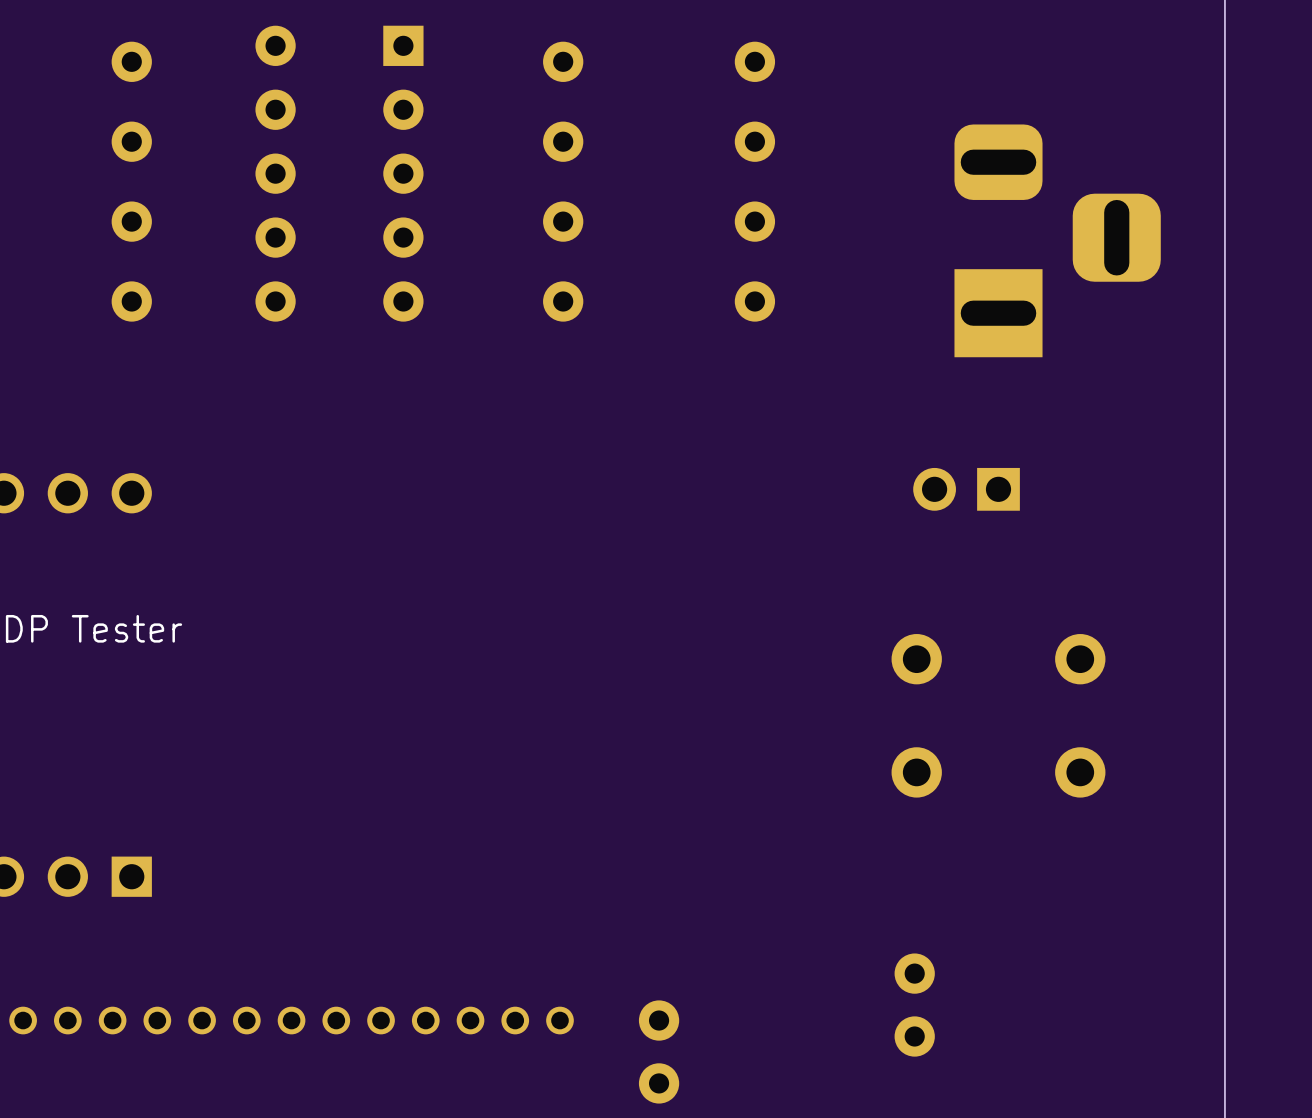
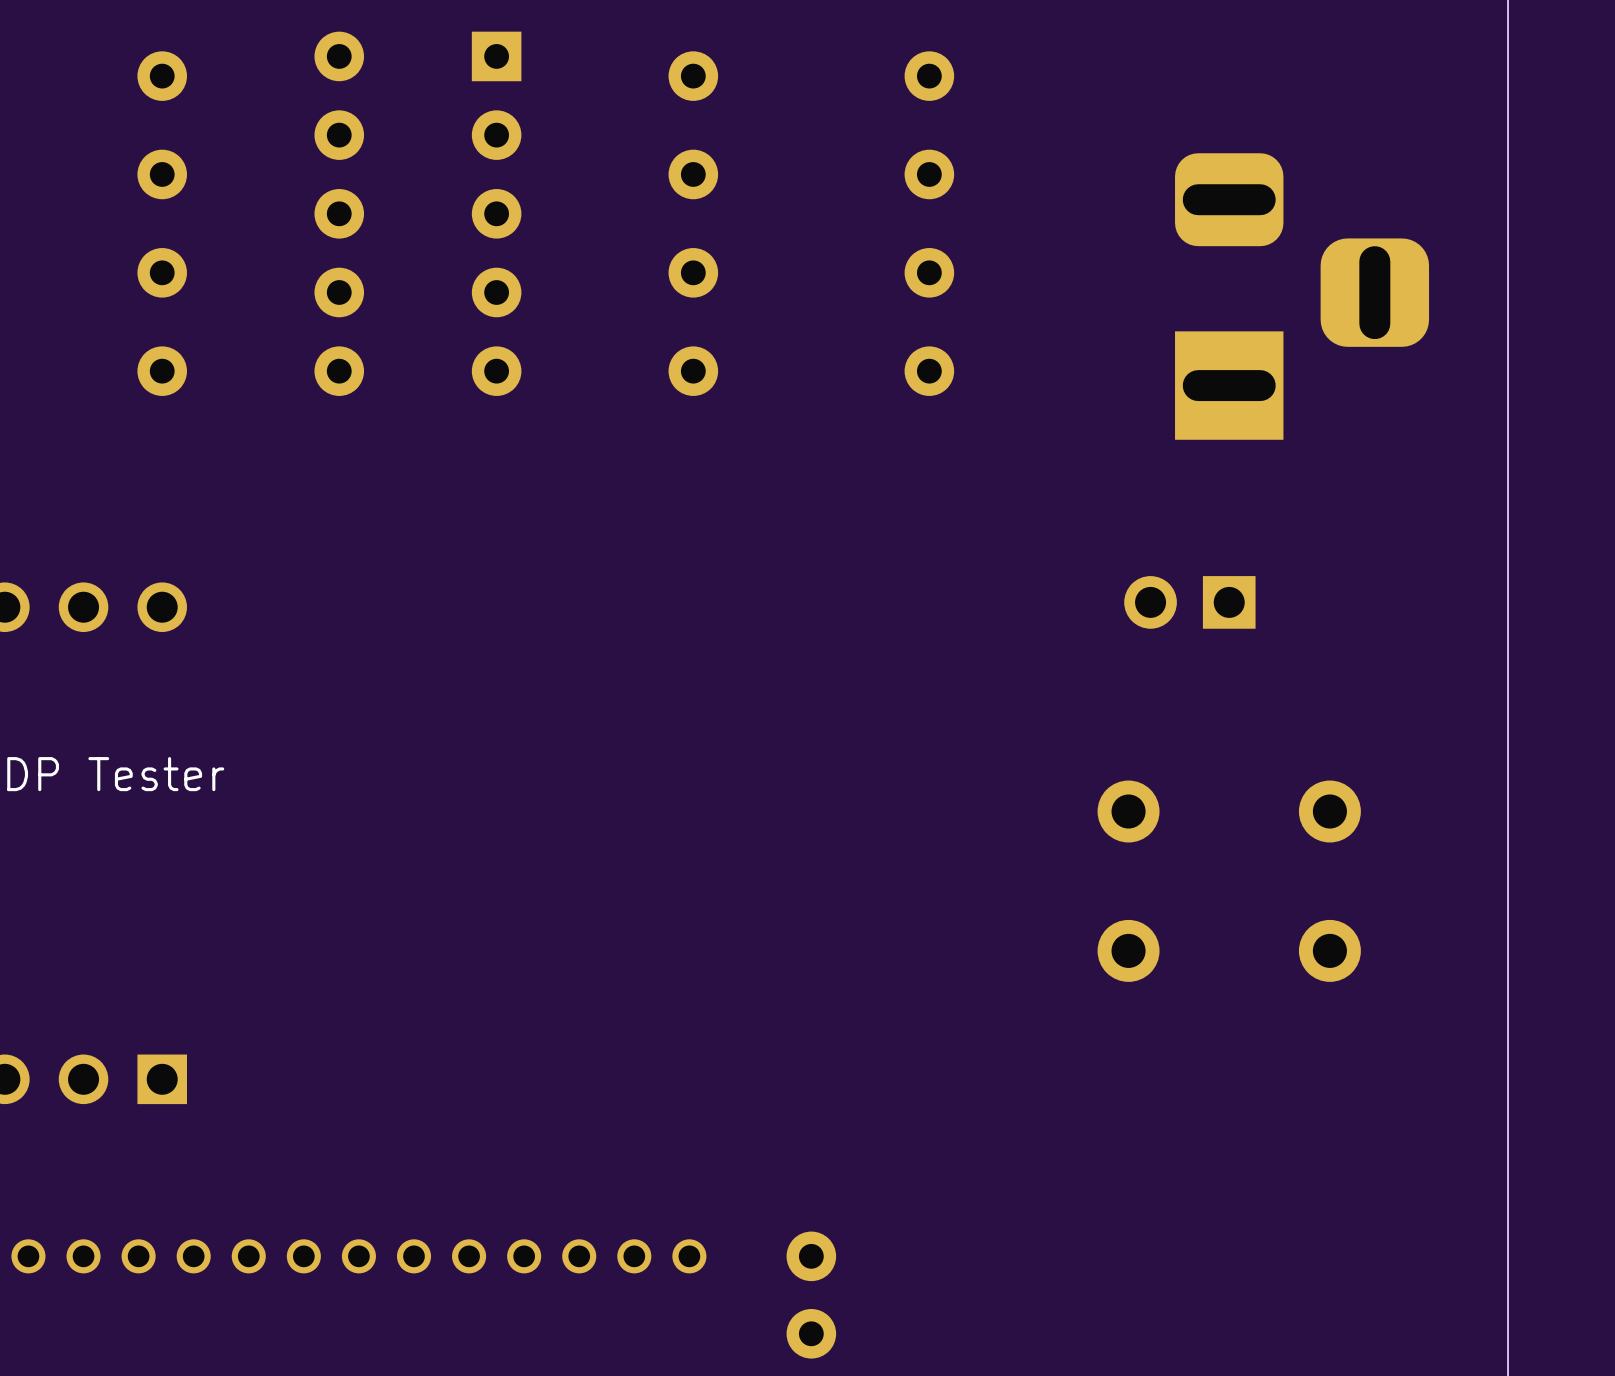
part: (914, 1005) -> none

